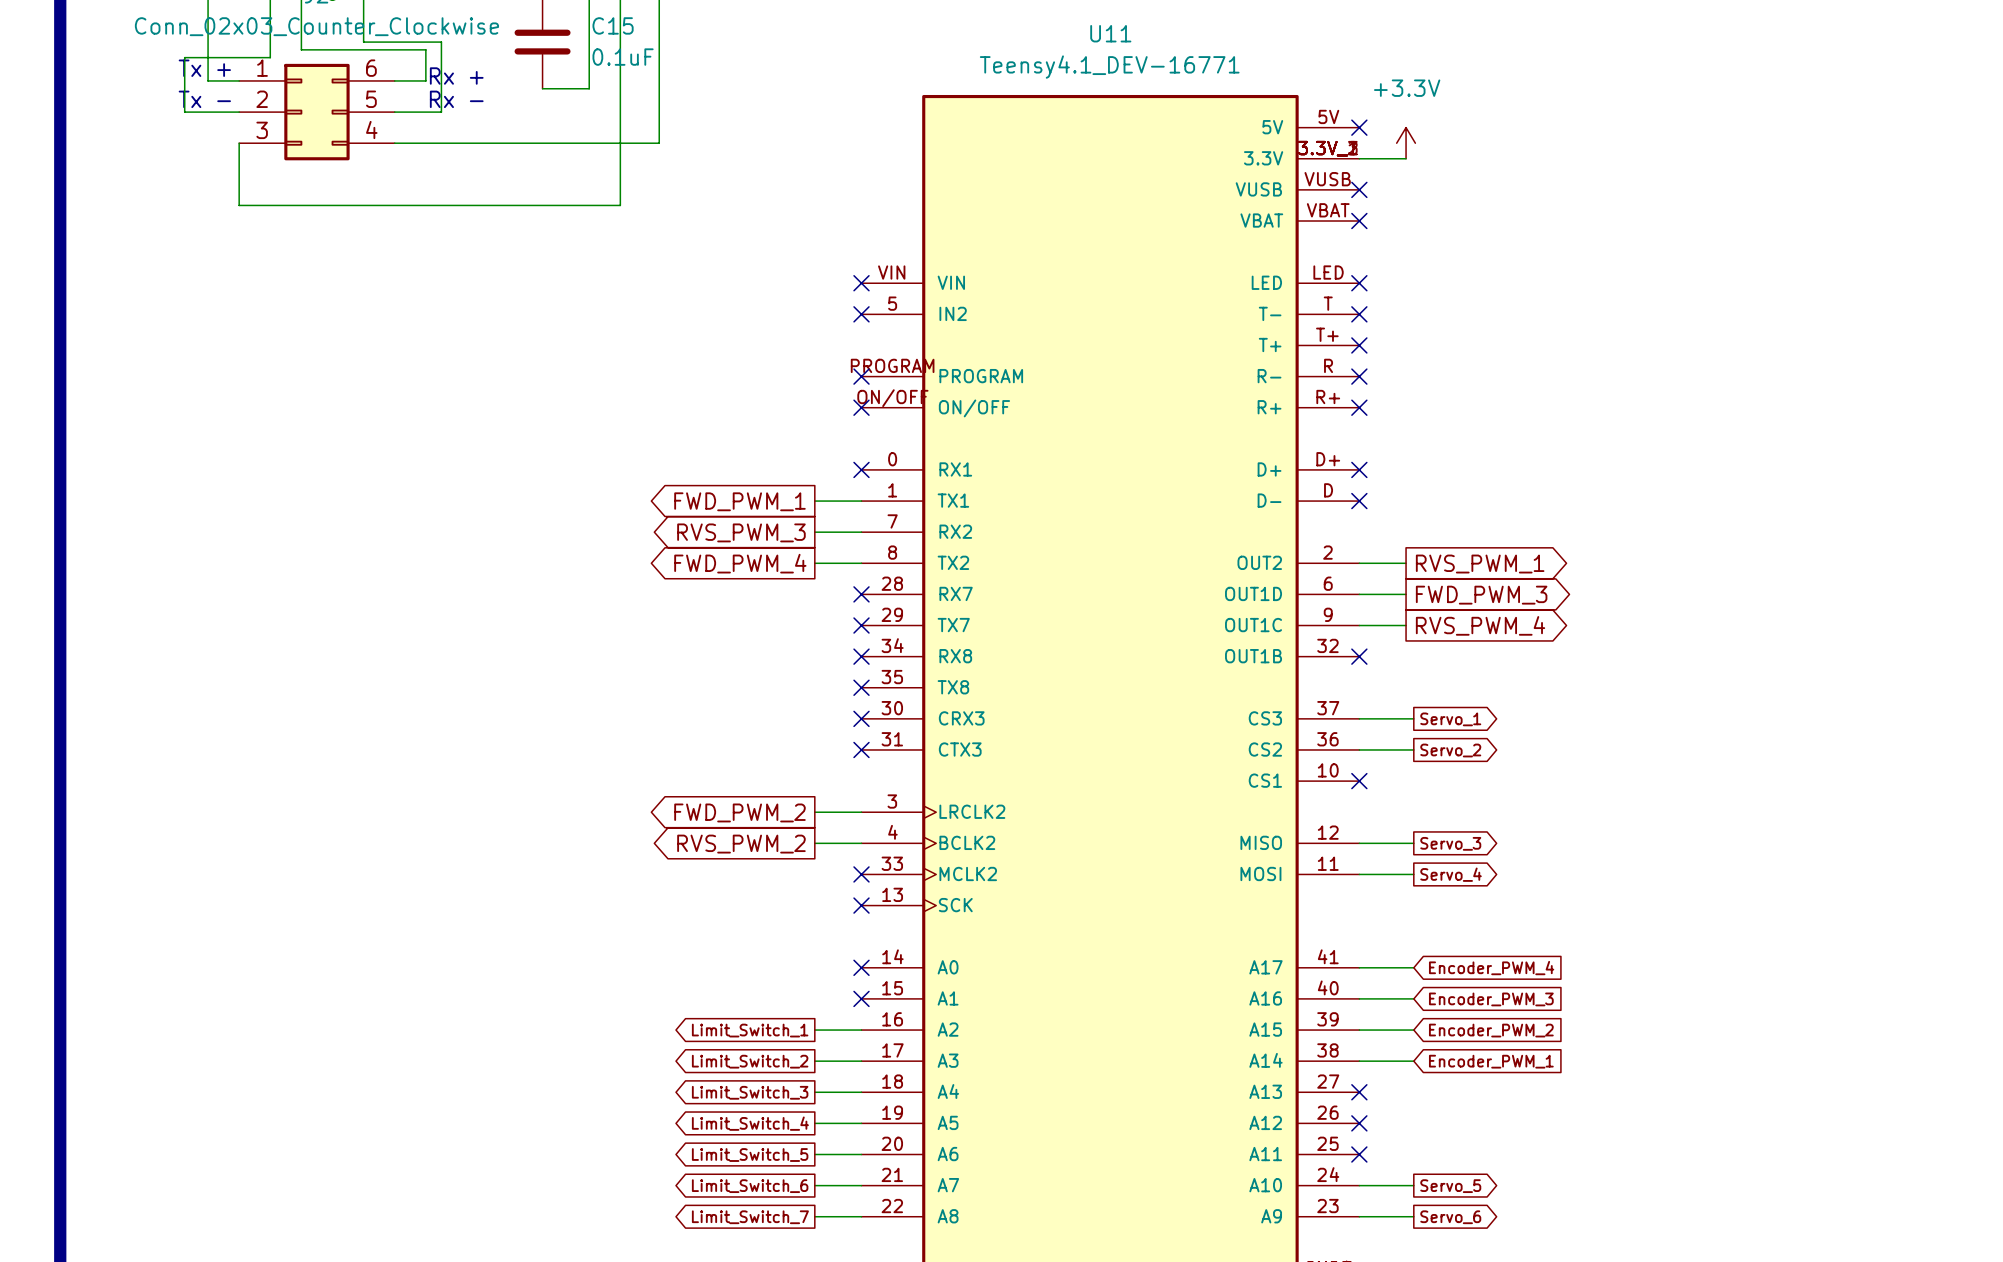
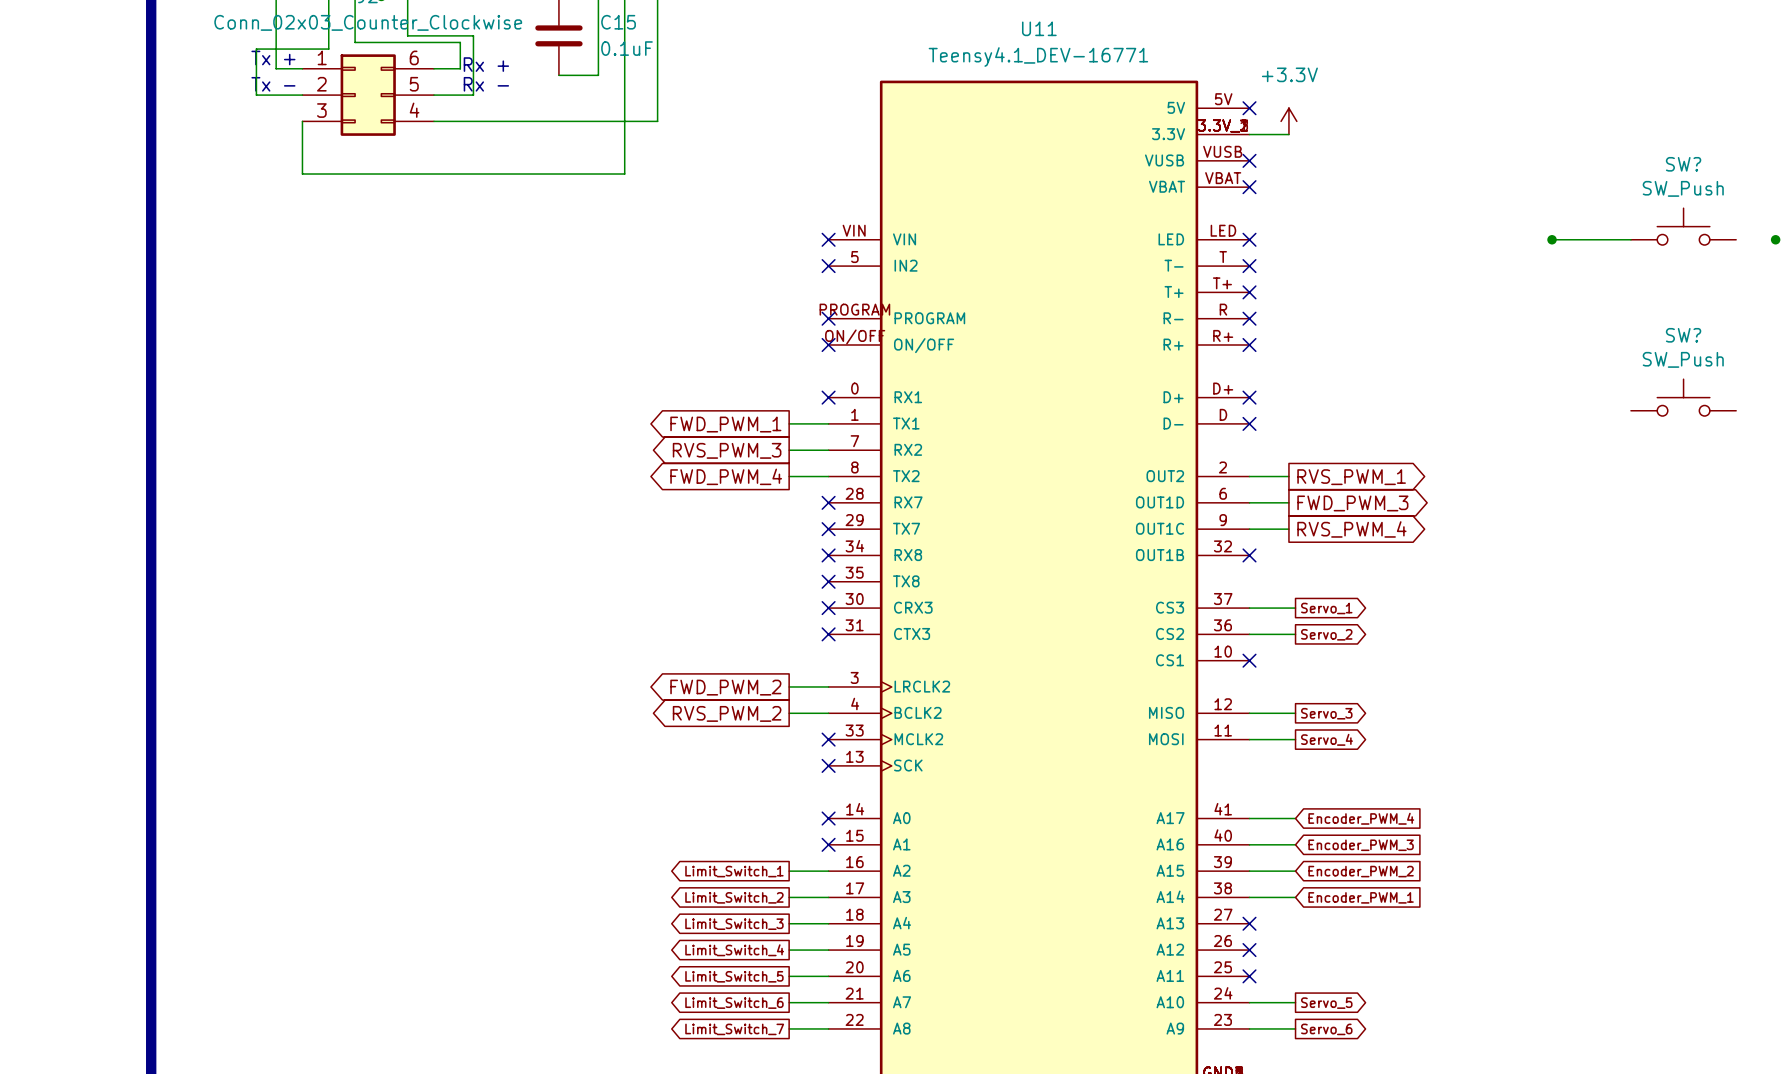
SW?: none -> SW_Push (1683, 226)
wire: none -> (1552, 239) (1630, 239)
junction: none -> (1552, 239)
junction: none -> (1775, 239)
SW?: none -> SW_Push (1683, 397)

